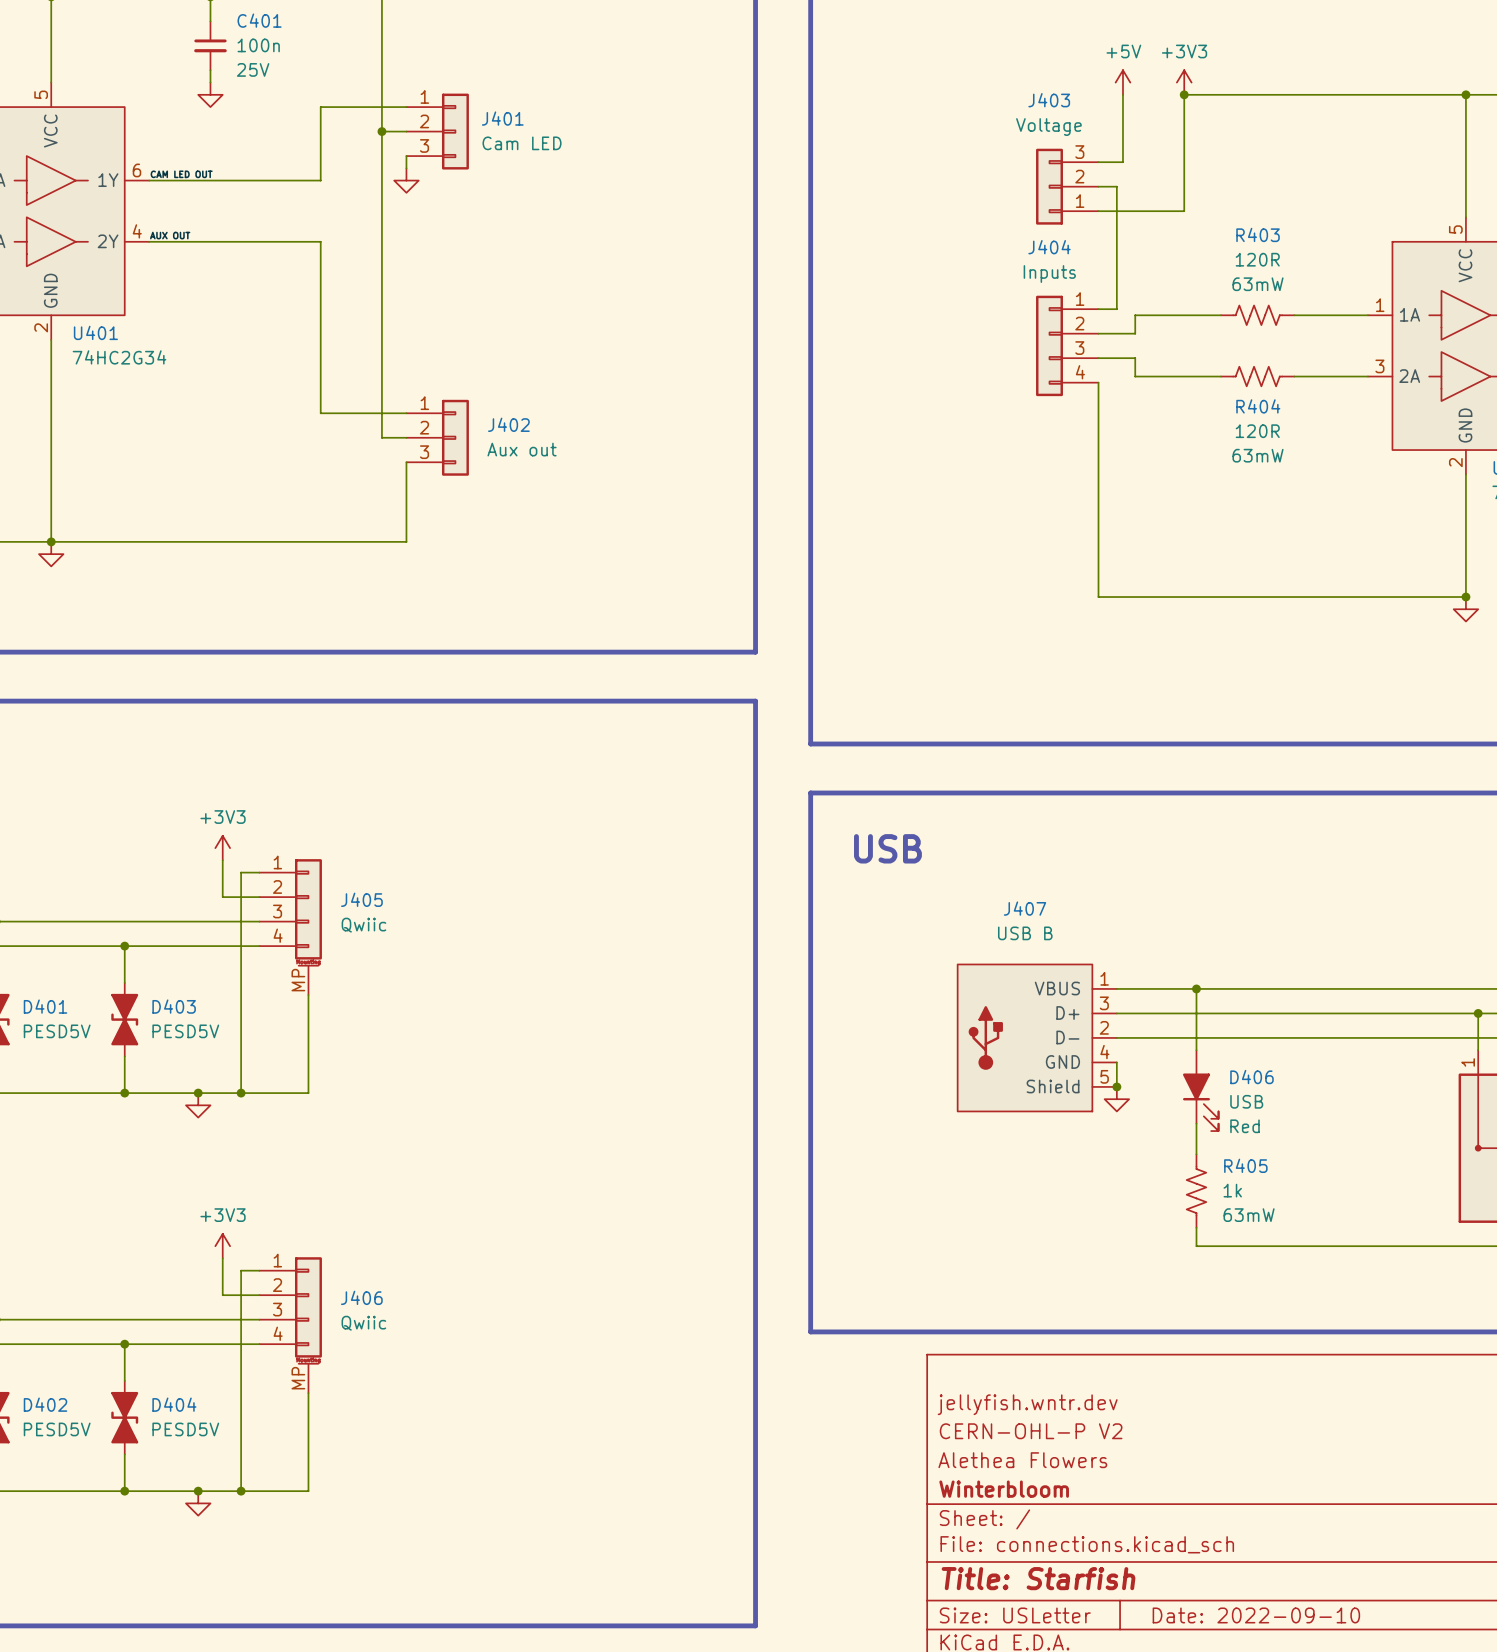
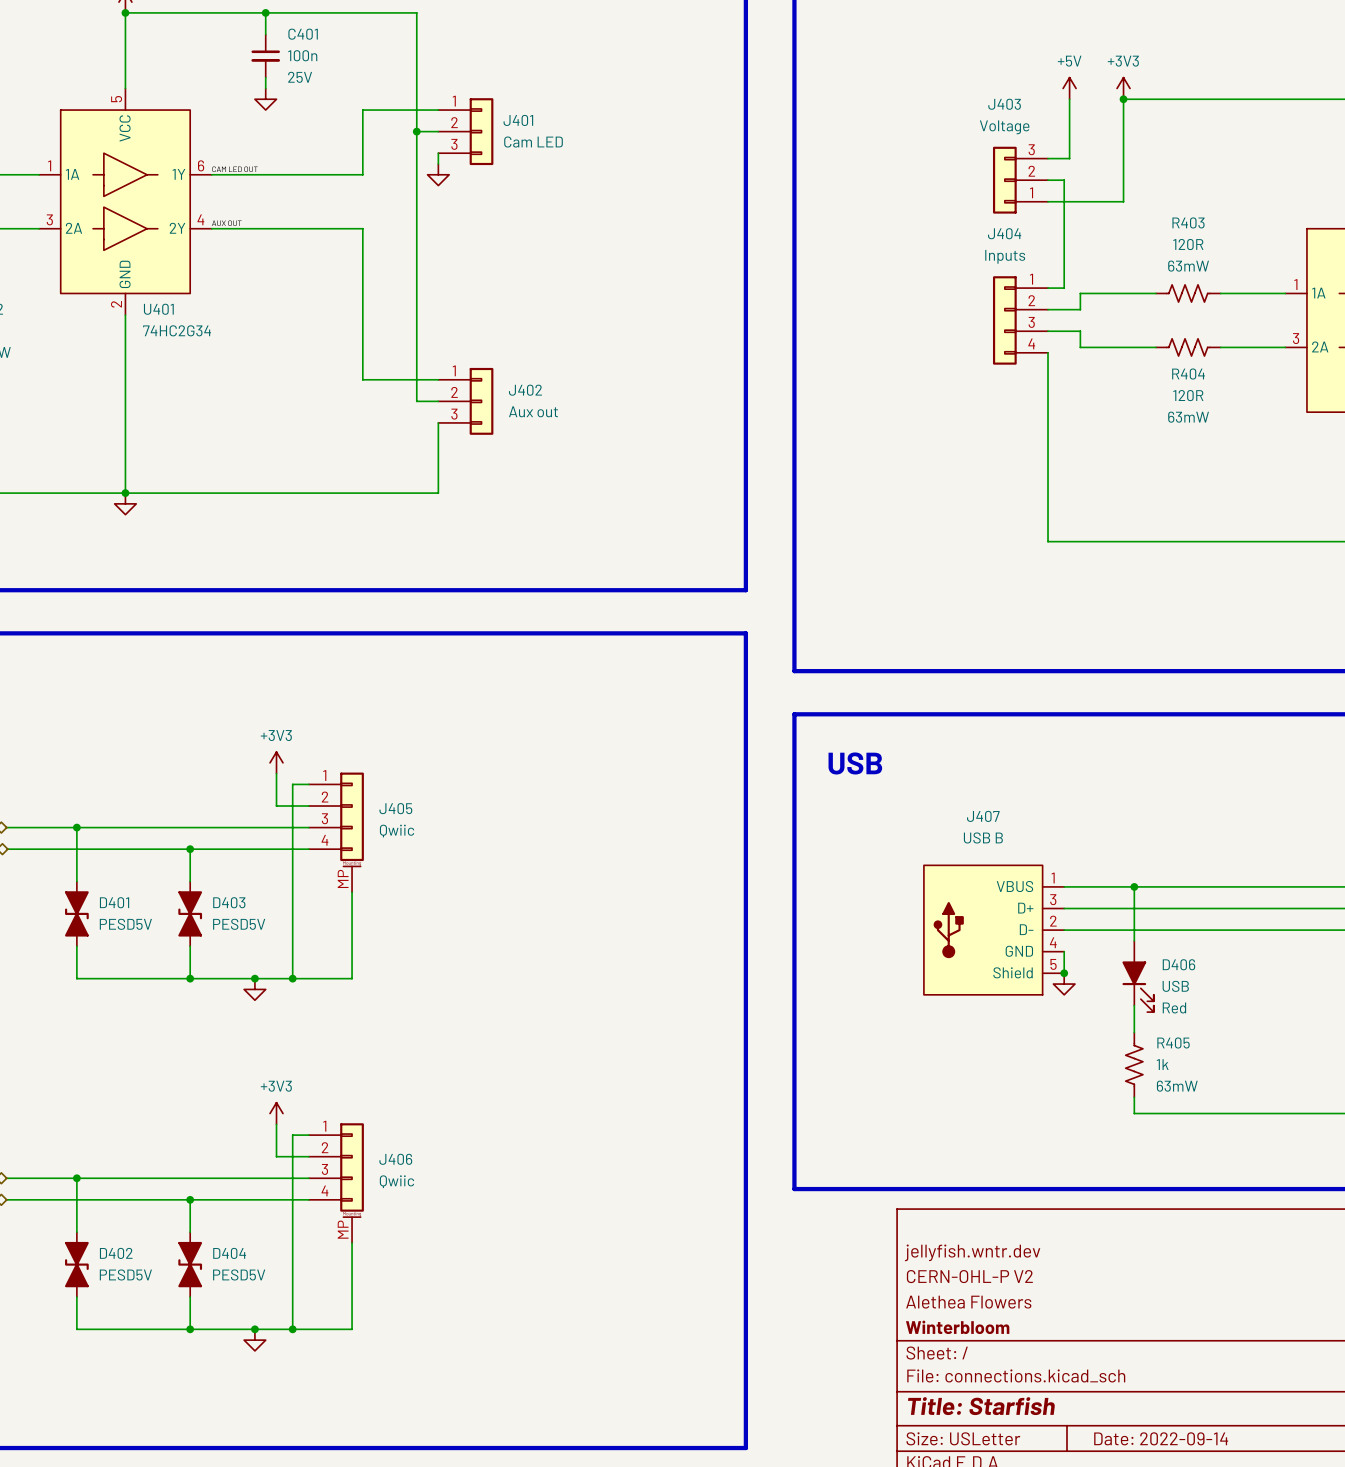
title block: Date: 2022-09-10 (1256, 1615) -> Date: 2022-09-14 (1161, 1438)

